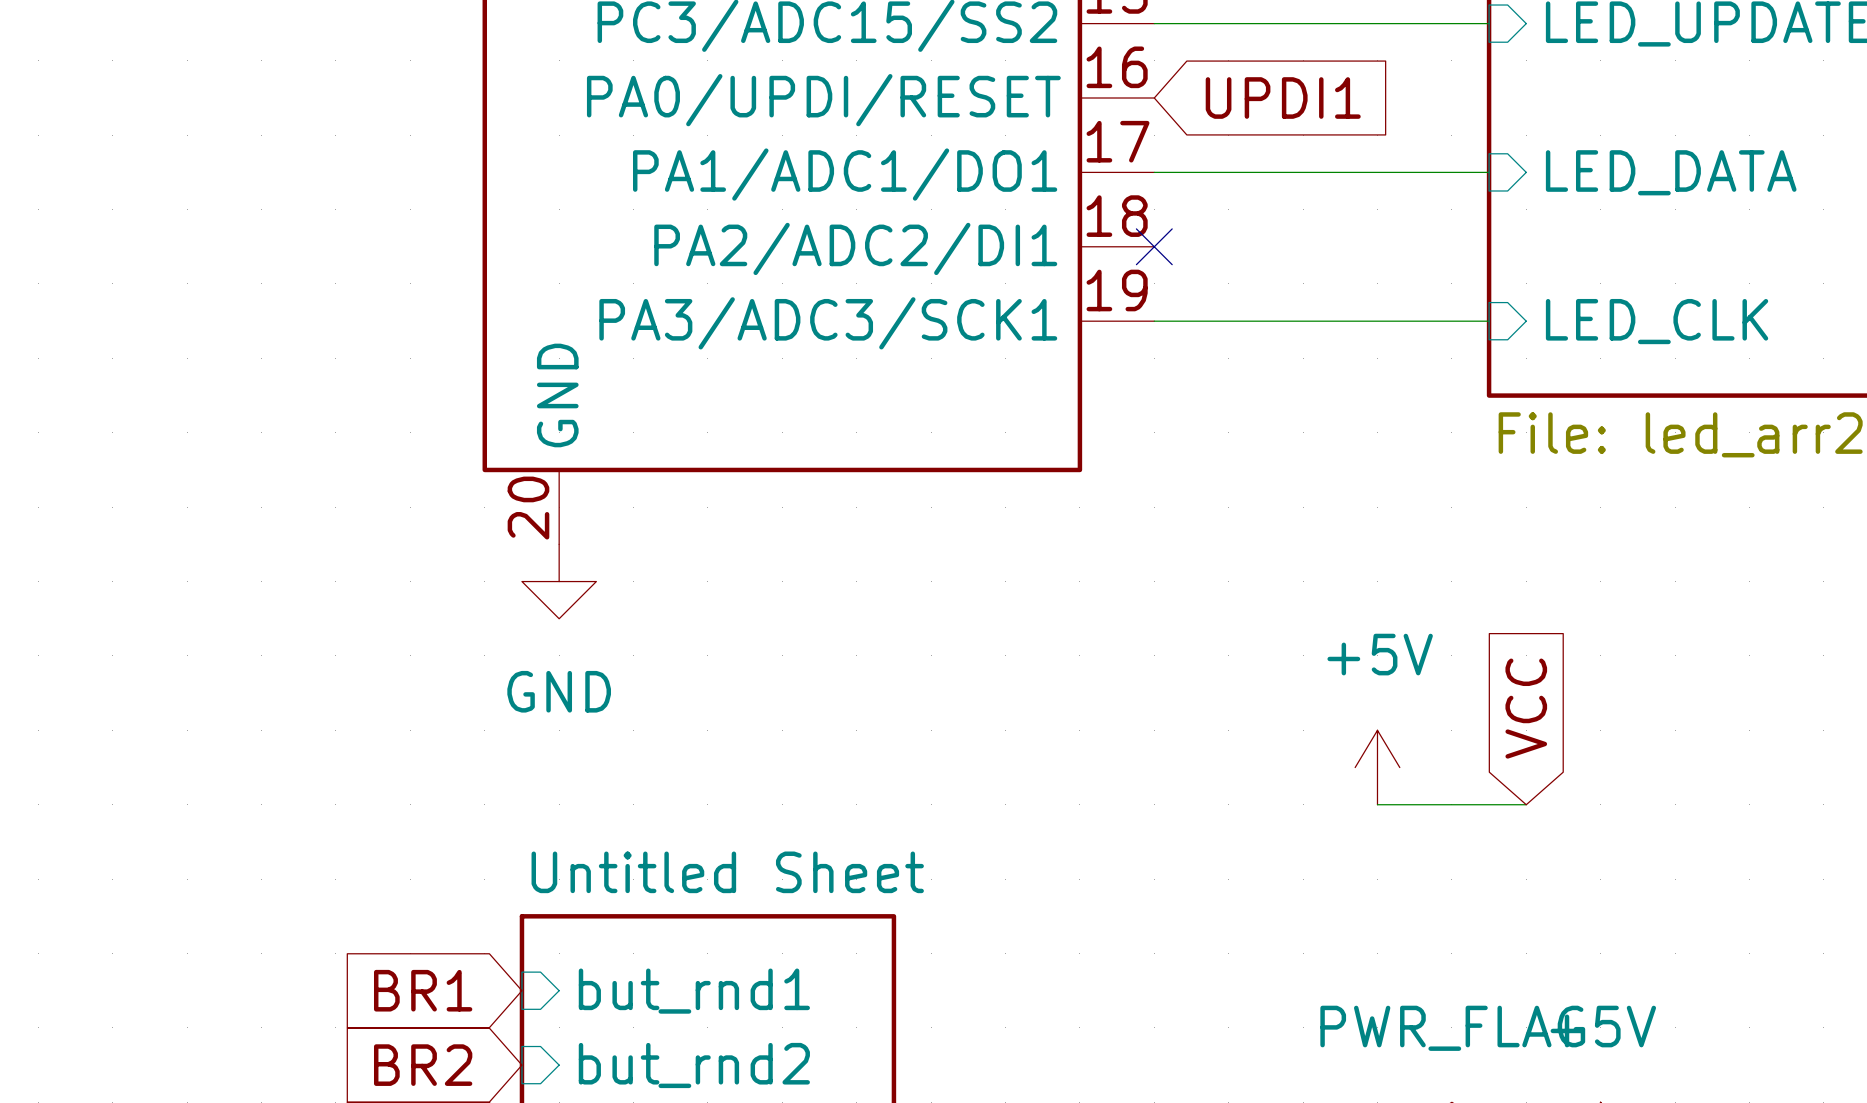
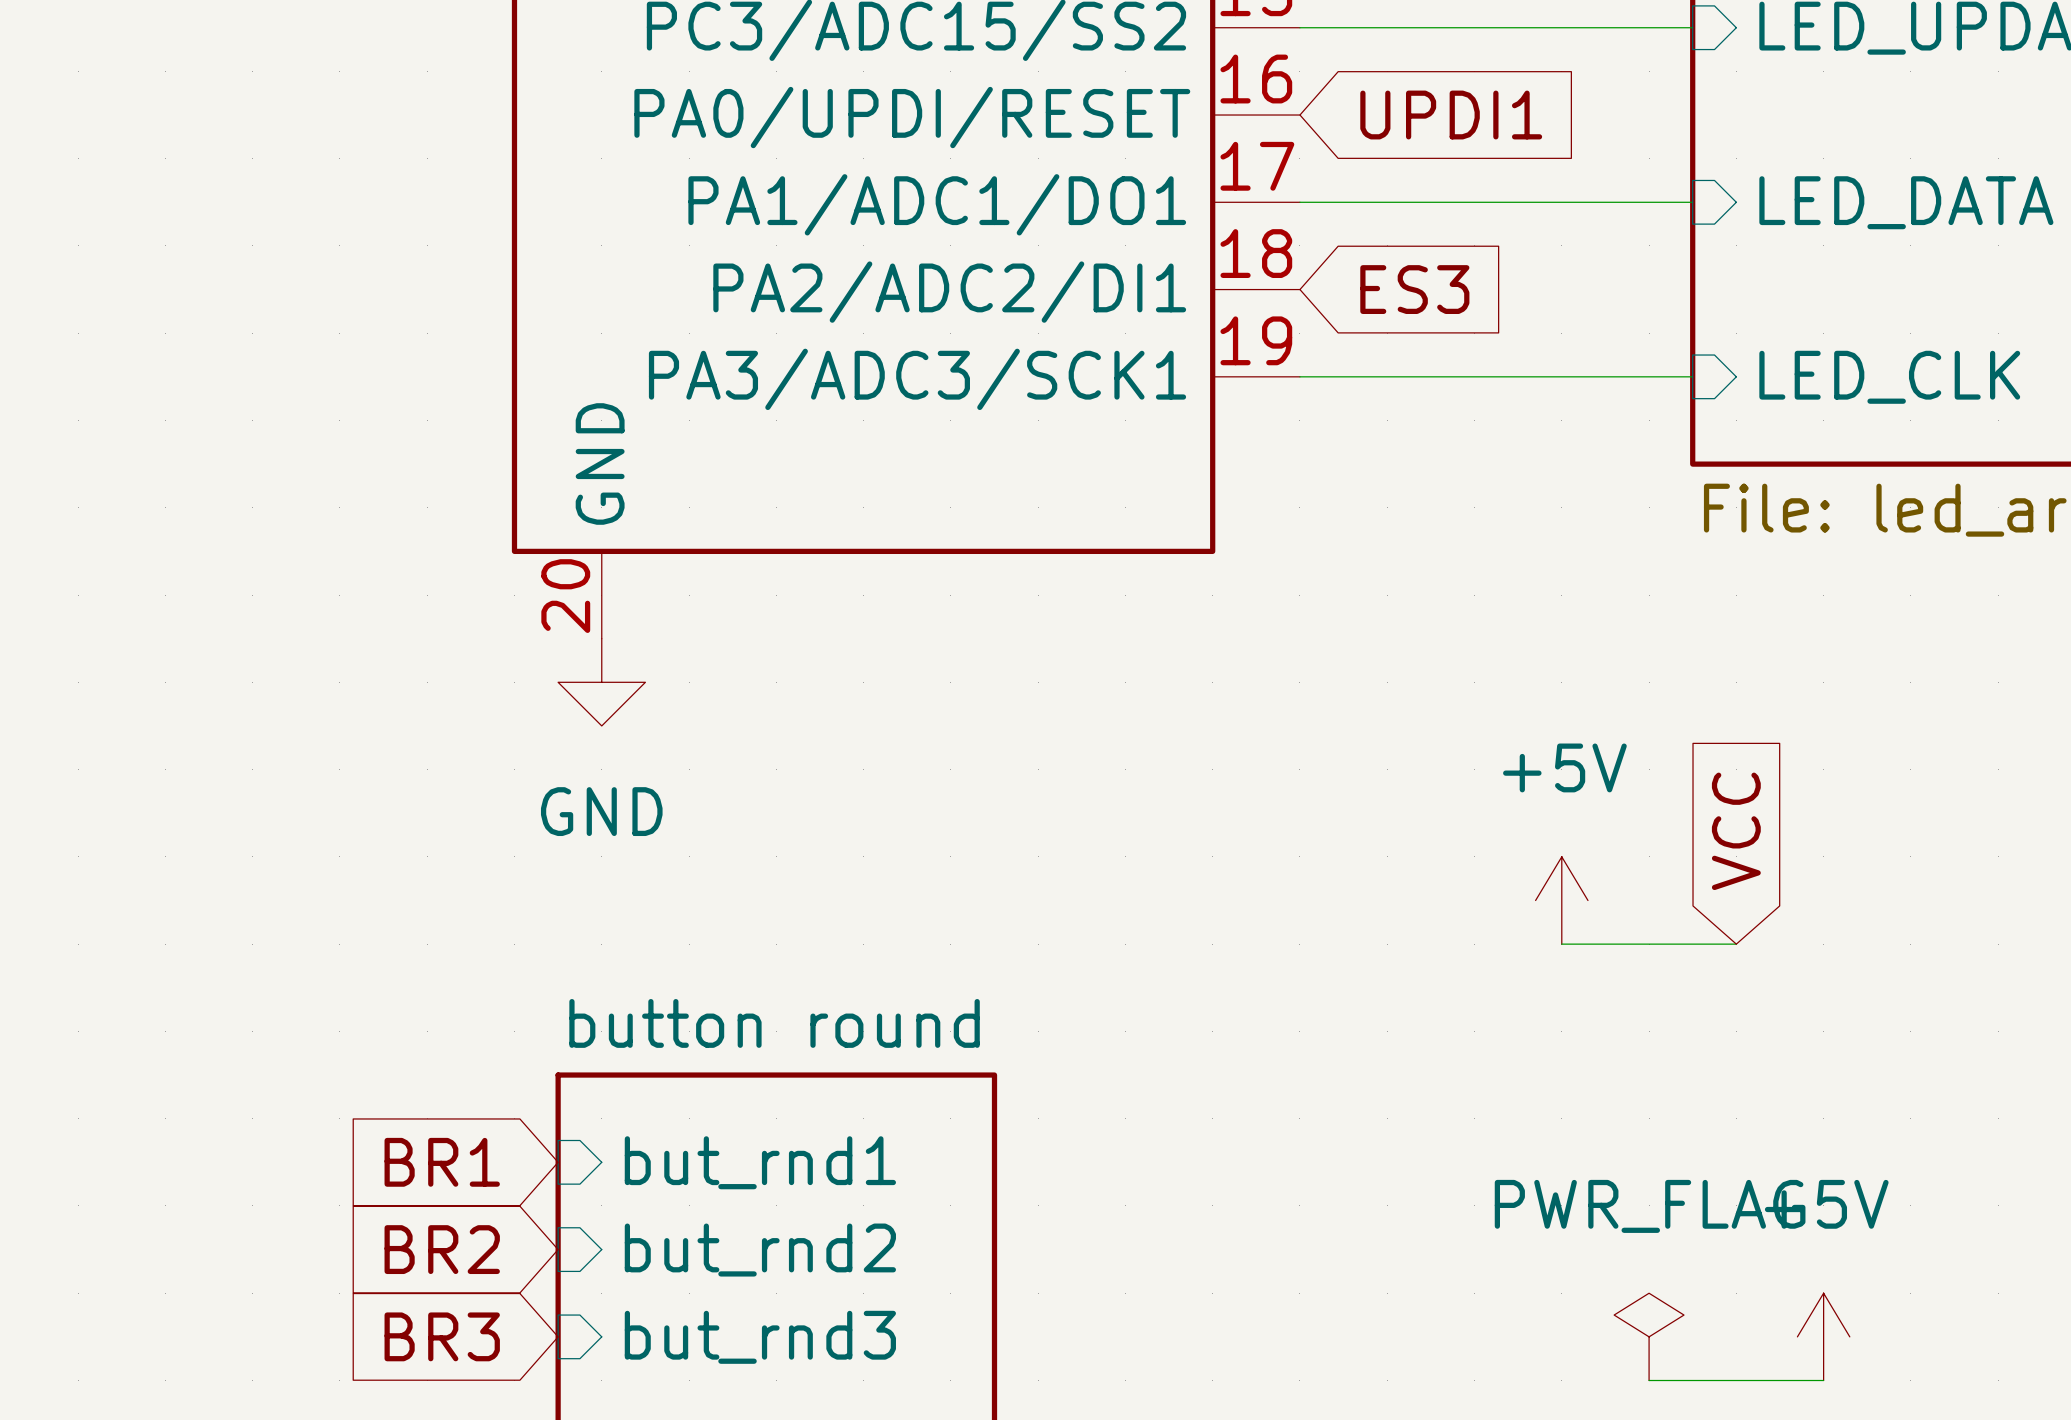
no-connect mark: (1154, 246) -> none
global label: none -> ES3 (1414, 289)
sheet Untitled Sheet name: Untitled Sheet (727, 872) -> button round (774, 1023)

